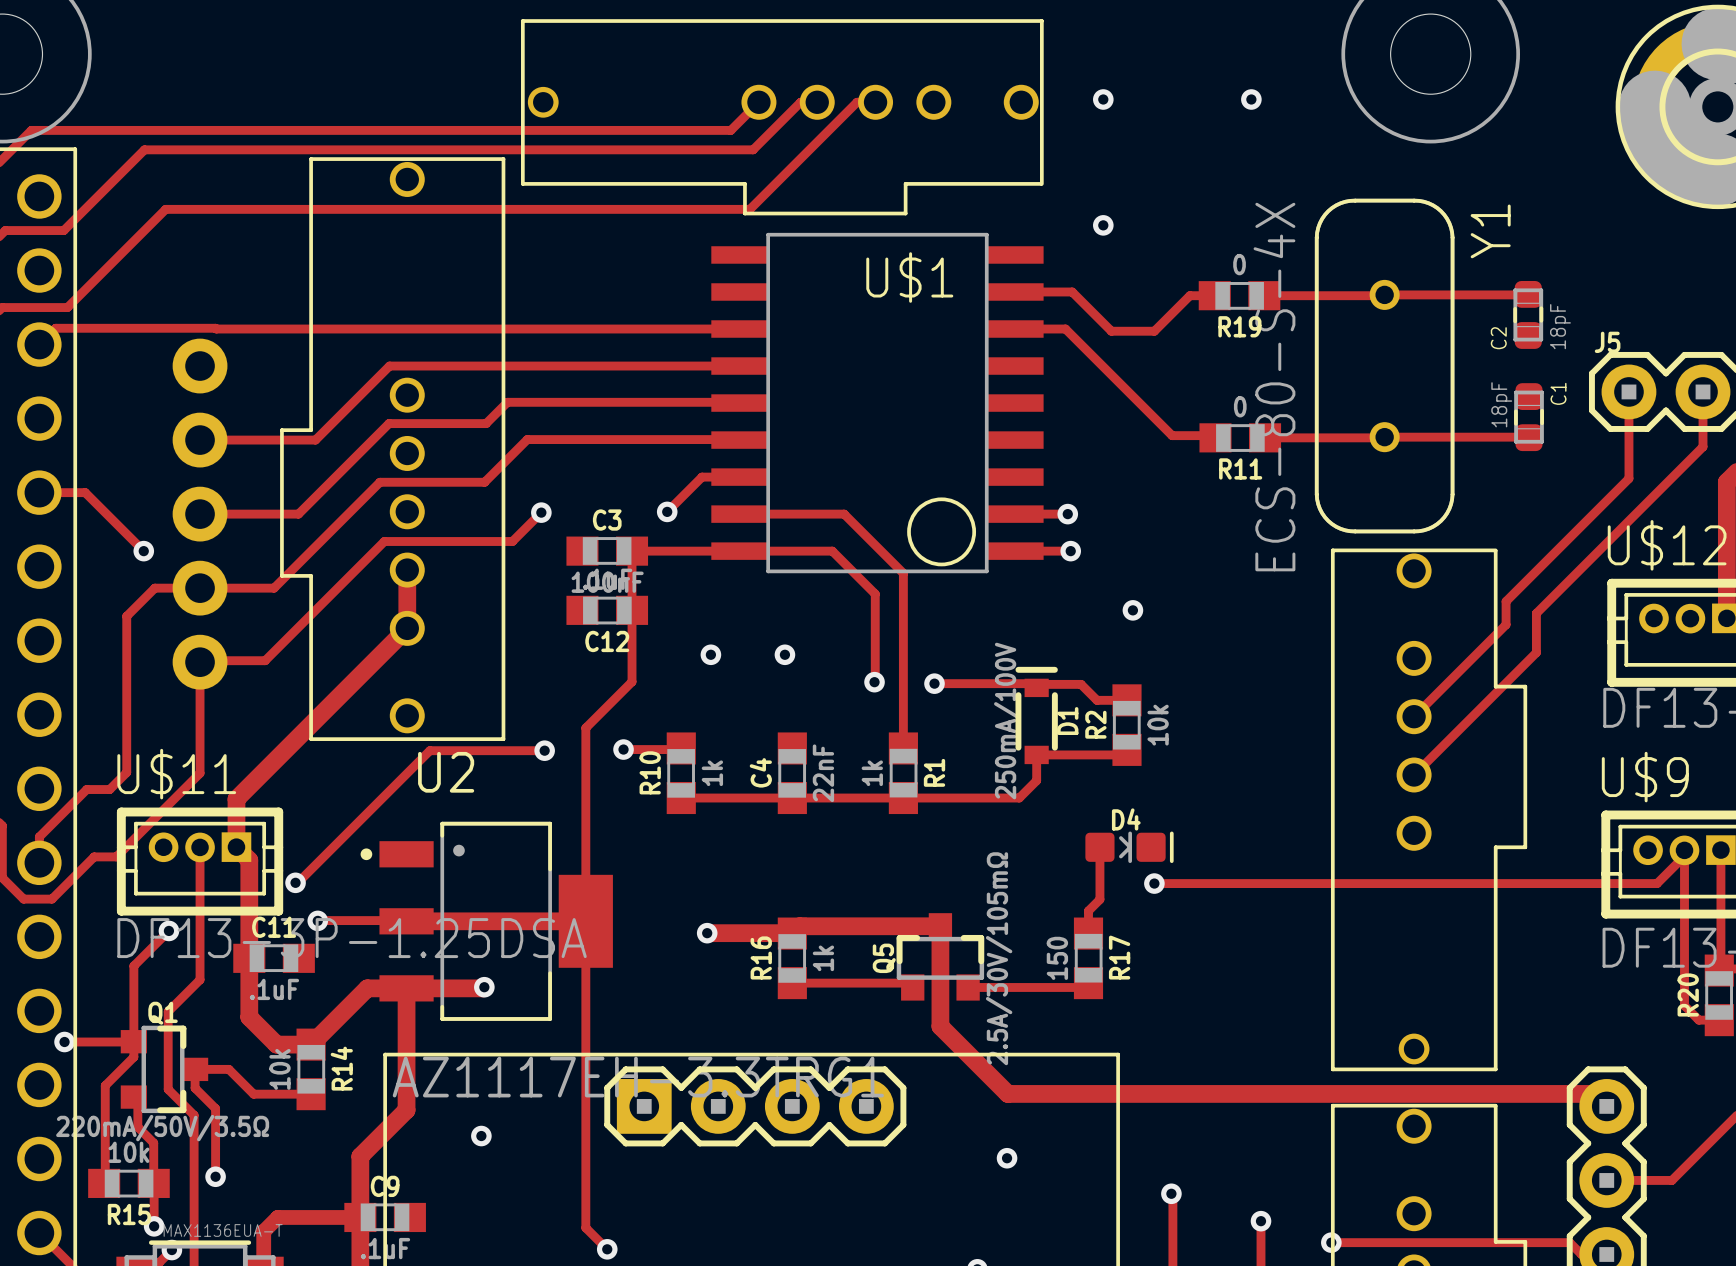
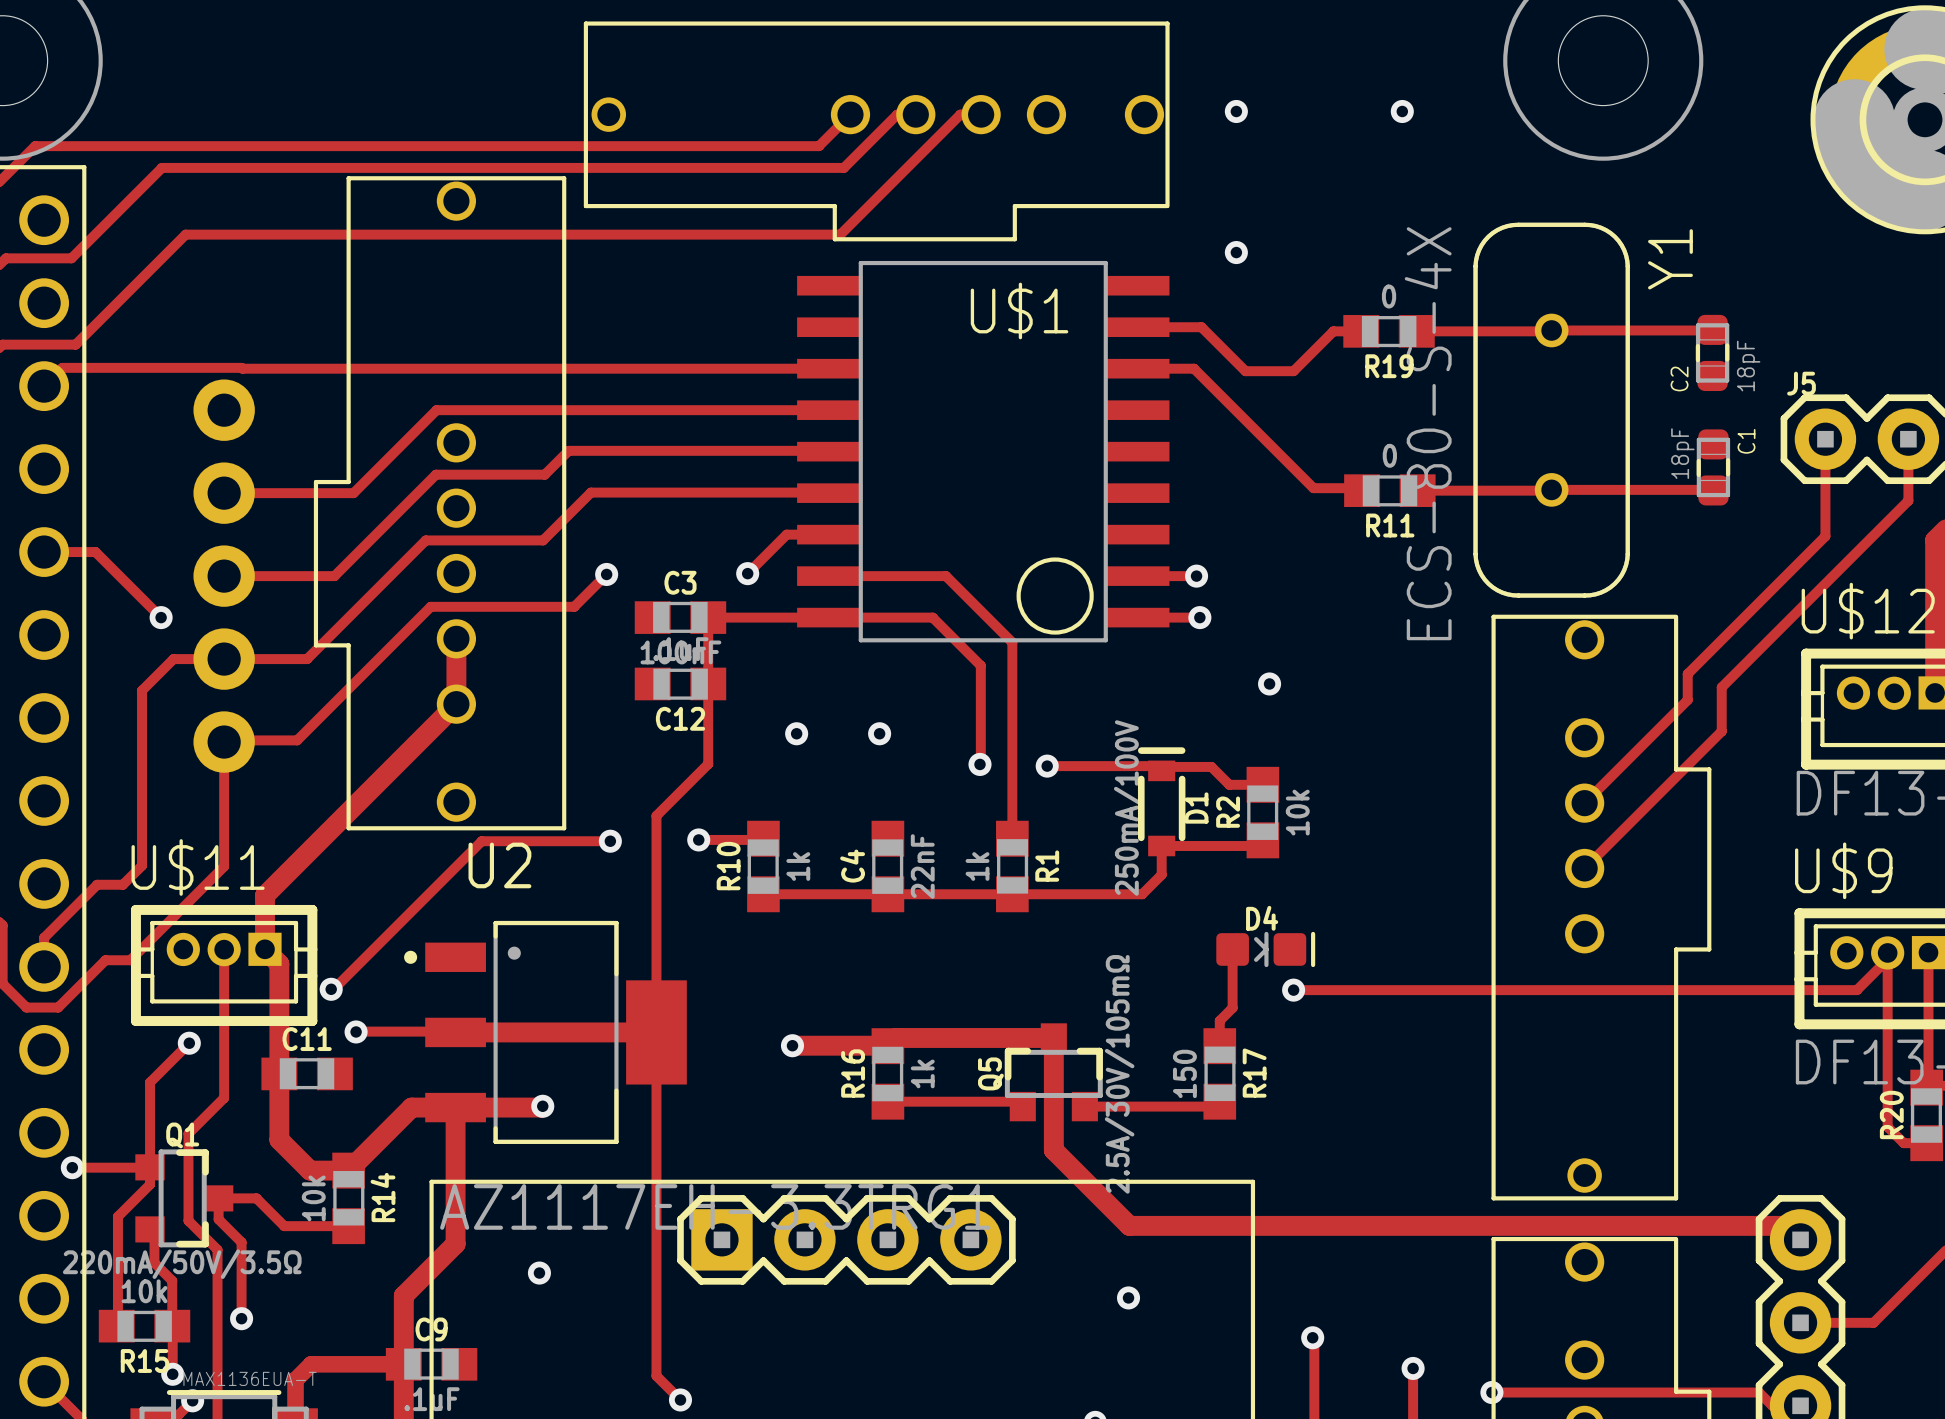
U$11 value: DF13-3P-1.25DSA (352, 938) -> none
C11 value: .1uF (274, 989) -> none

